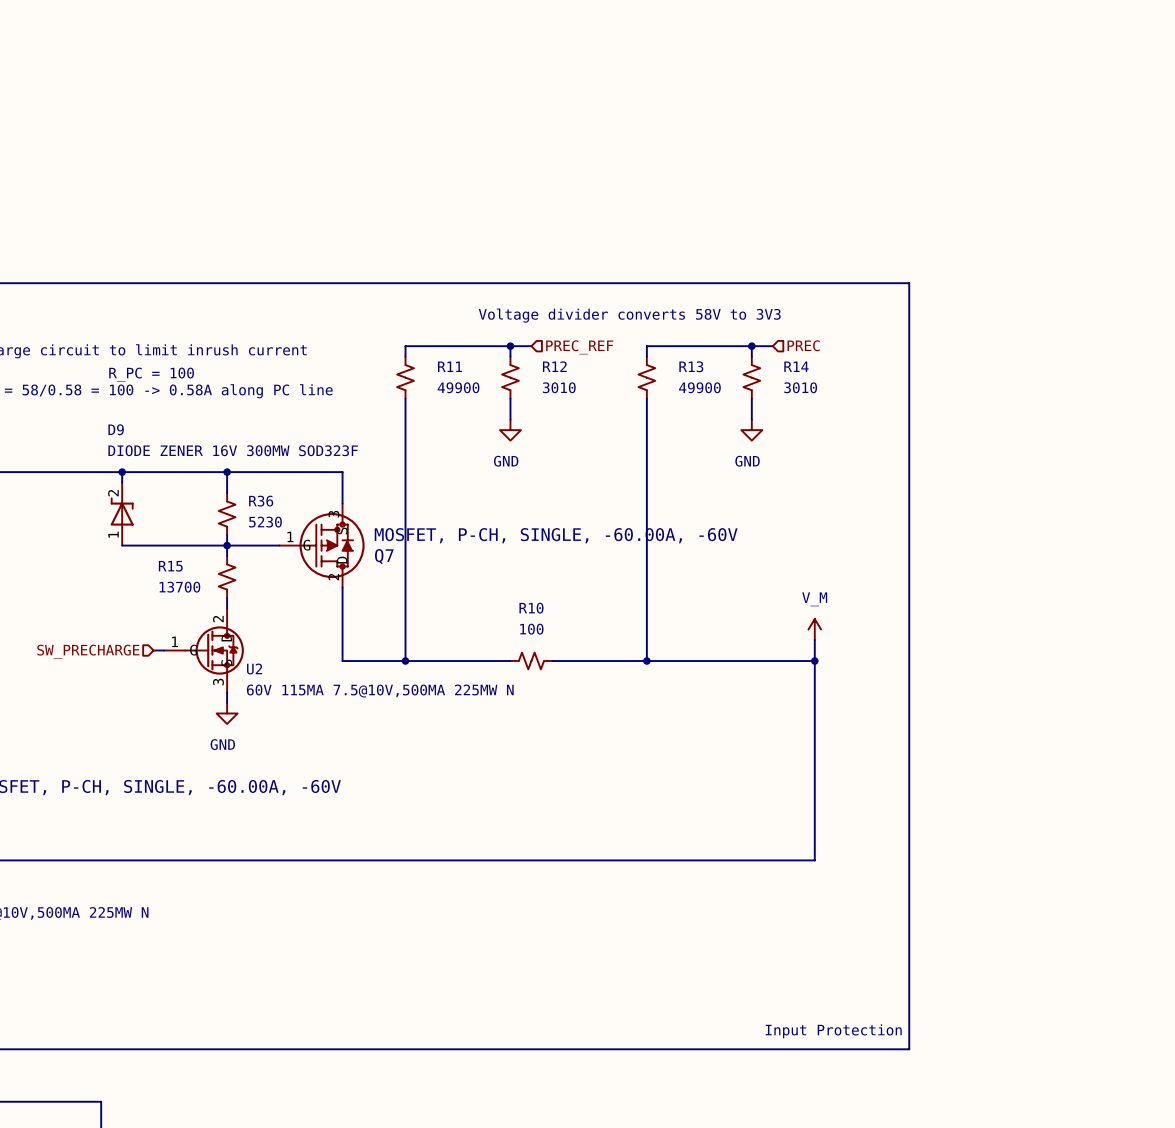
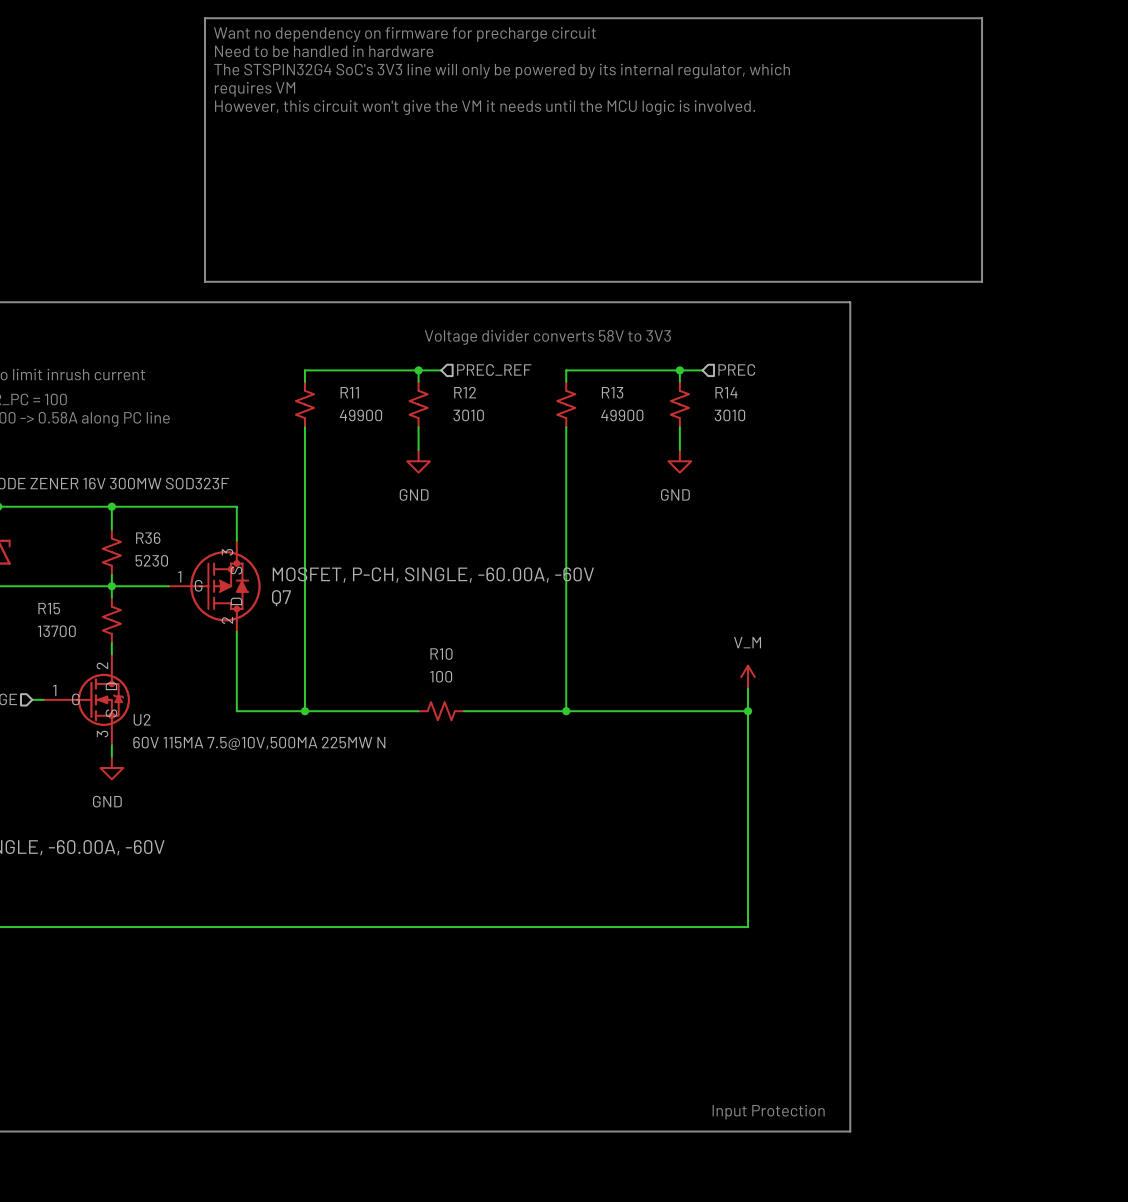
line: none -> (205, 18) (982, 18) (982, 281) (205, 281) (205, 18)
text: none -> Want no dependency on firmware for precharge circuit (404, 34)
text: none -> Need to be handled in hardware (324, 51)
text: none -> The STSPIN32G4 SoC's 3V3 line will only be powered by its internal regulator, which (502, 71)
text: none -> requires VM (254, 89)
text: none -> However, this circuit won't give the VM it needs until the MCU logic is involved. (485, 107)

